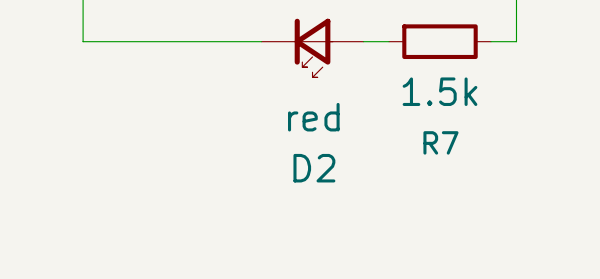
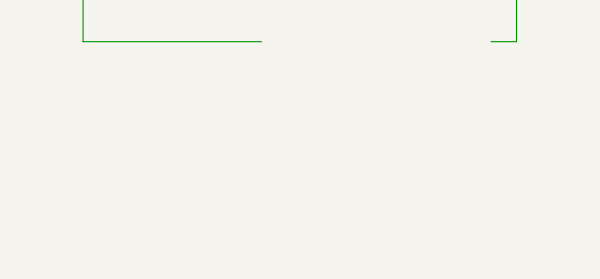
wire: (363, 41) (389, 41) -> none
R7: 1.5k (440, 41) -> none
D2: red (312, 48) -> none

